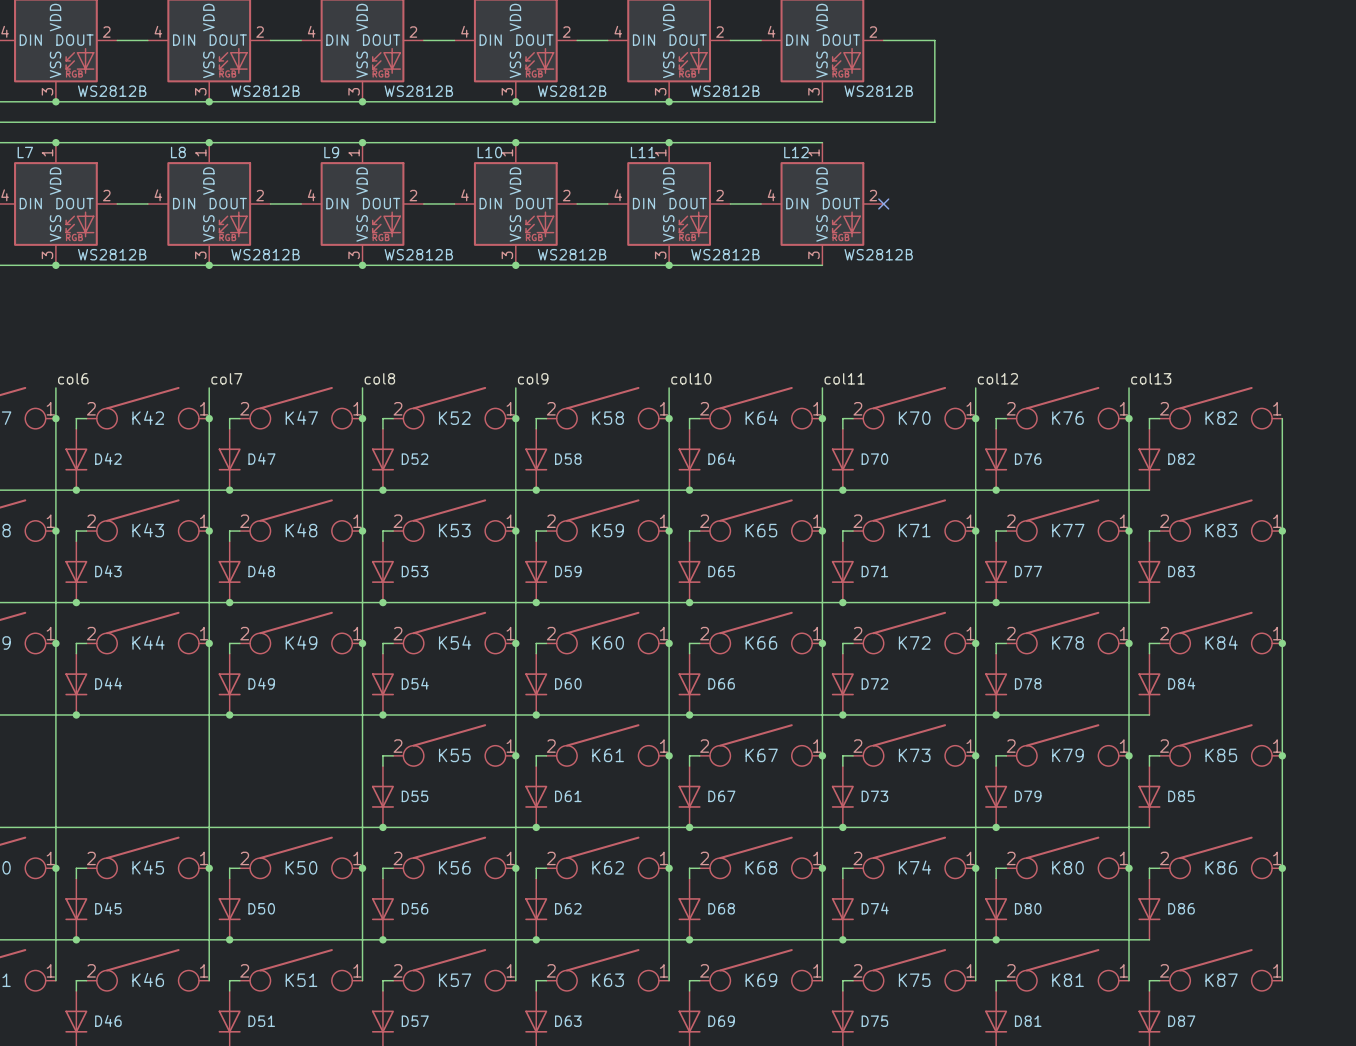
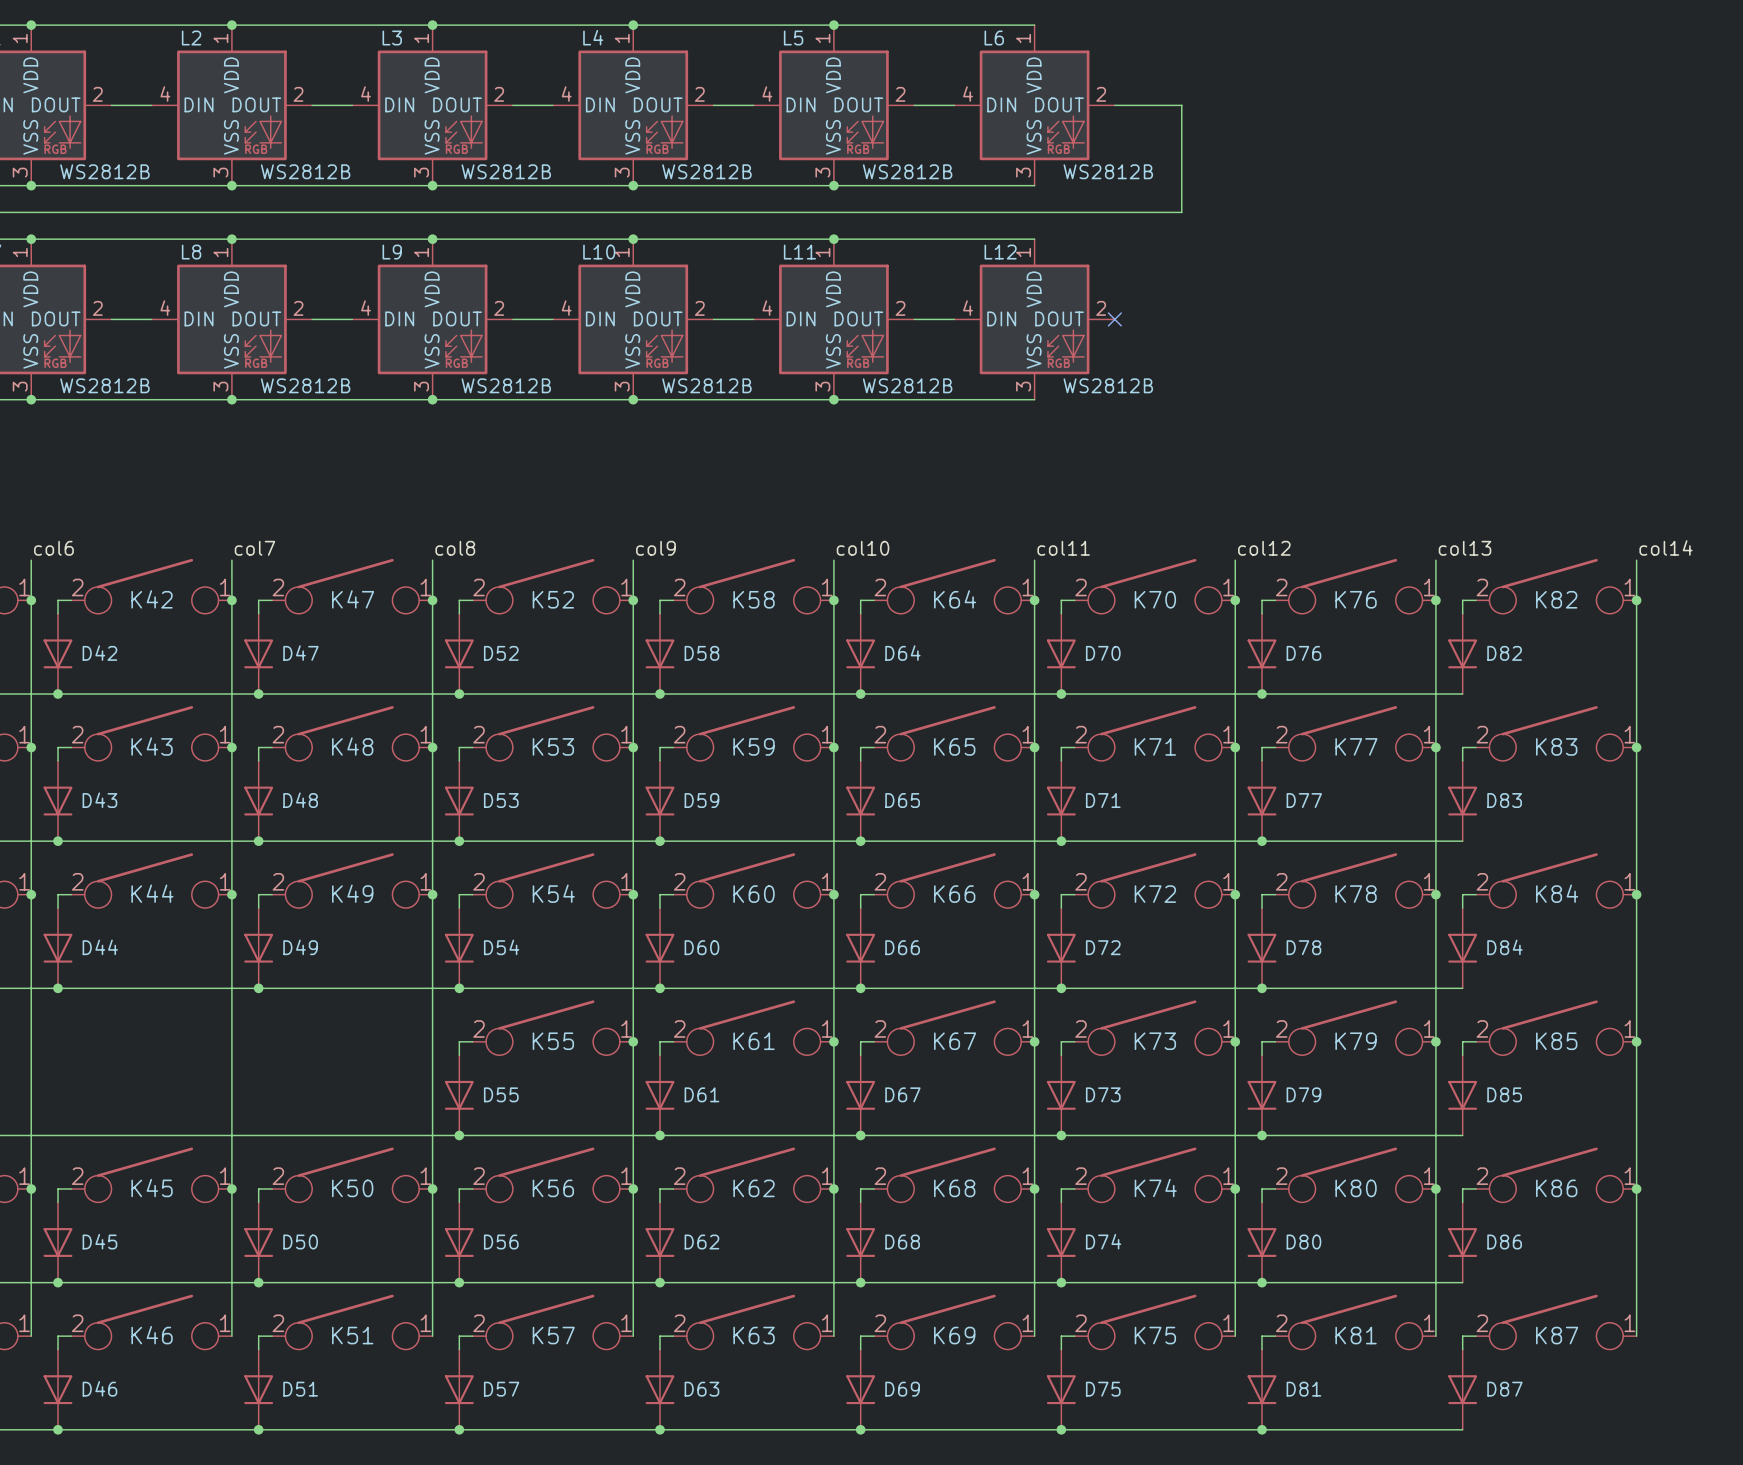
label: none -> col14 (1666, 547)
wire: none -> (1636, 560) (1636, 600)
junction: none -> (1636, 600)

